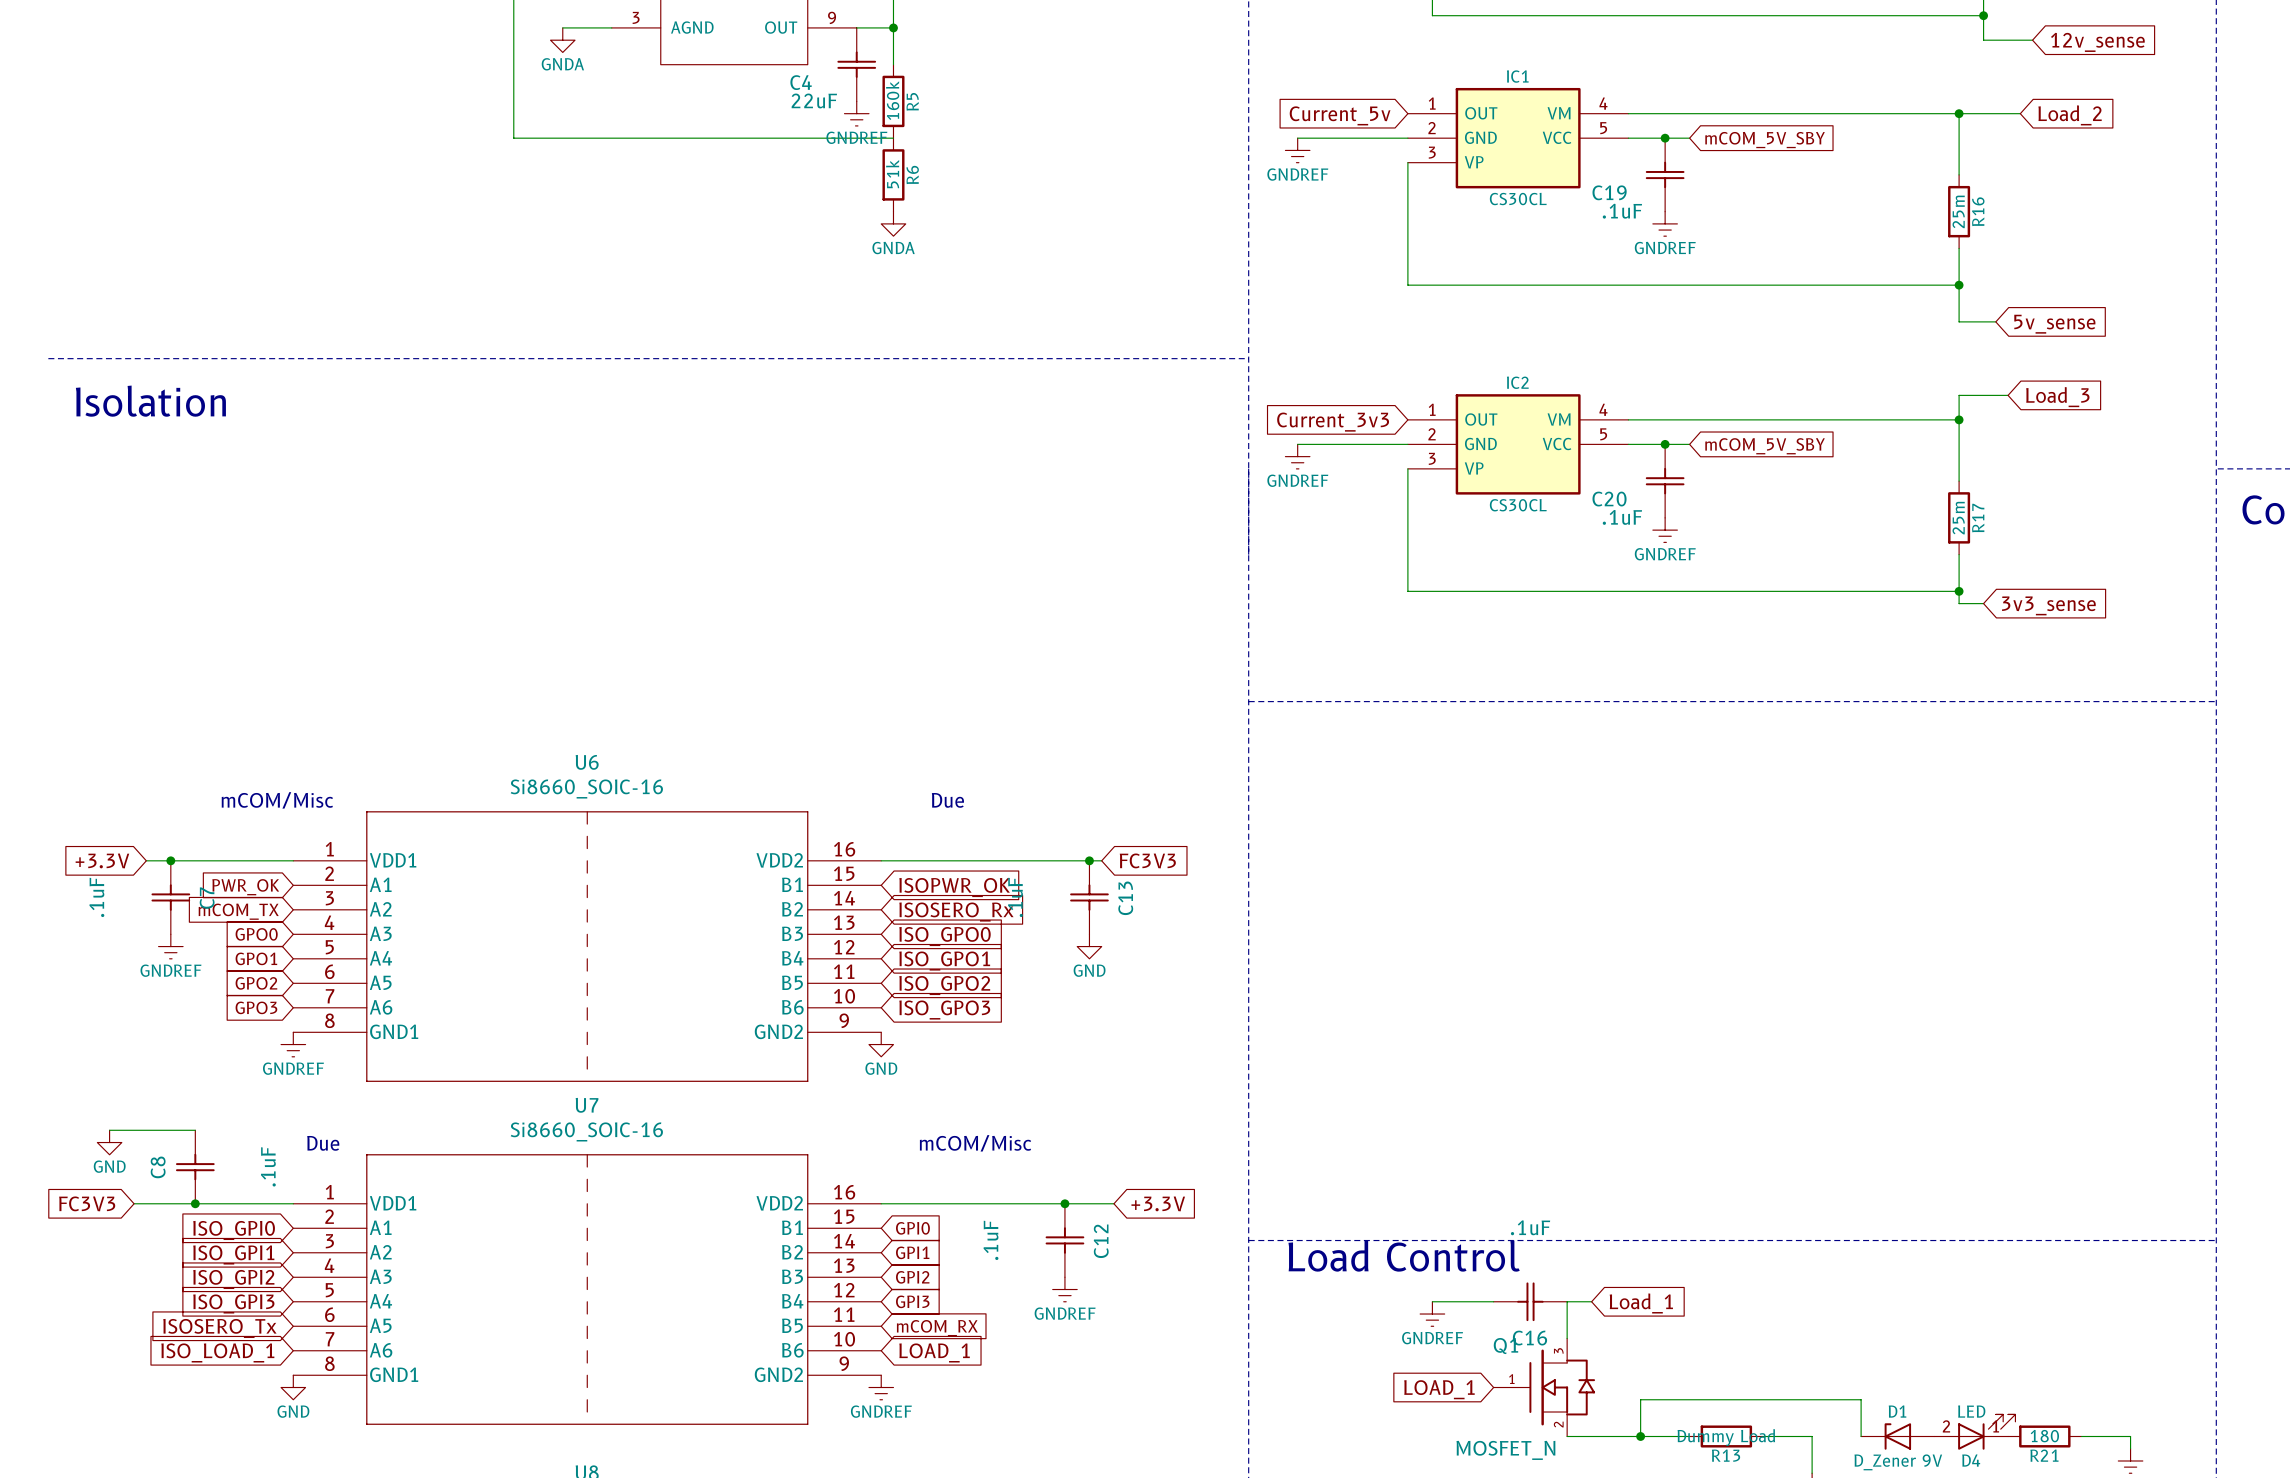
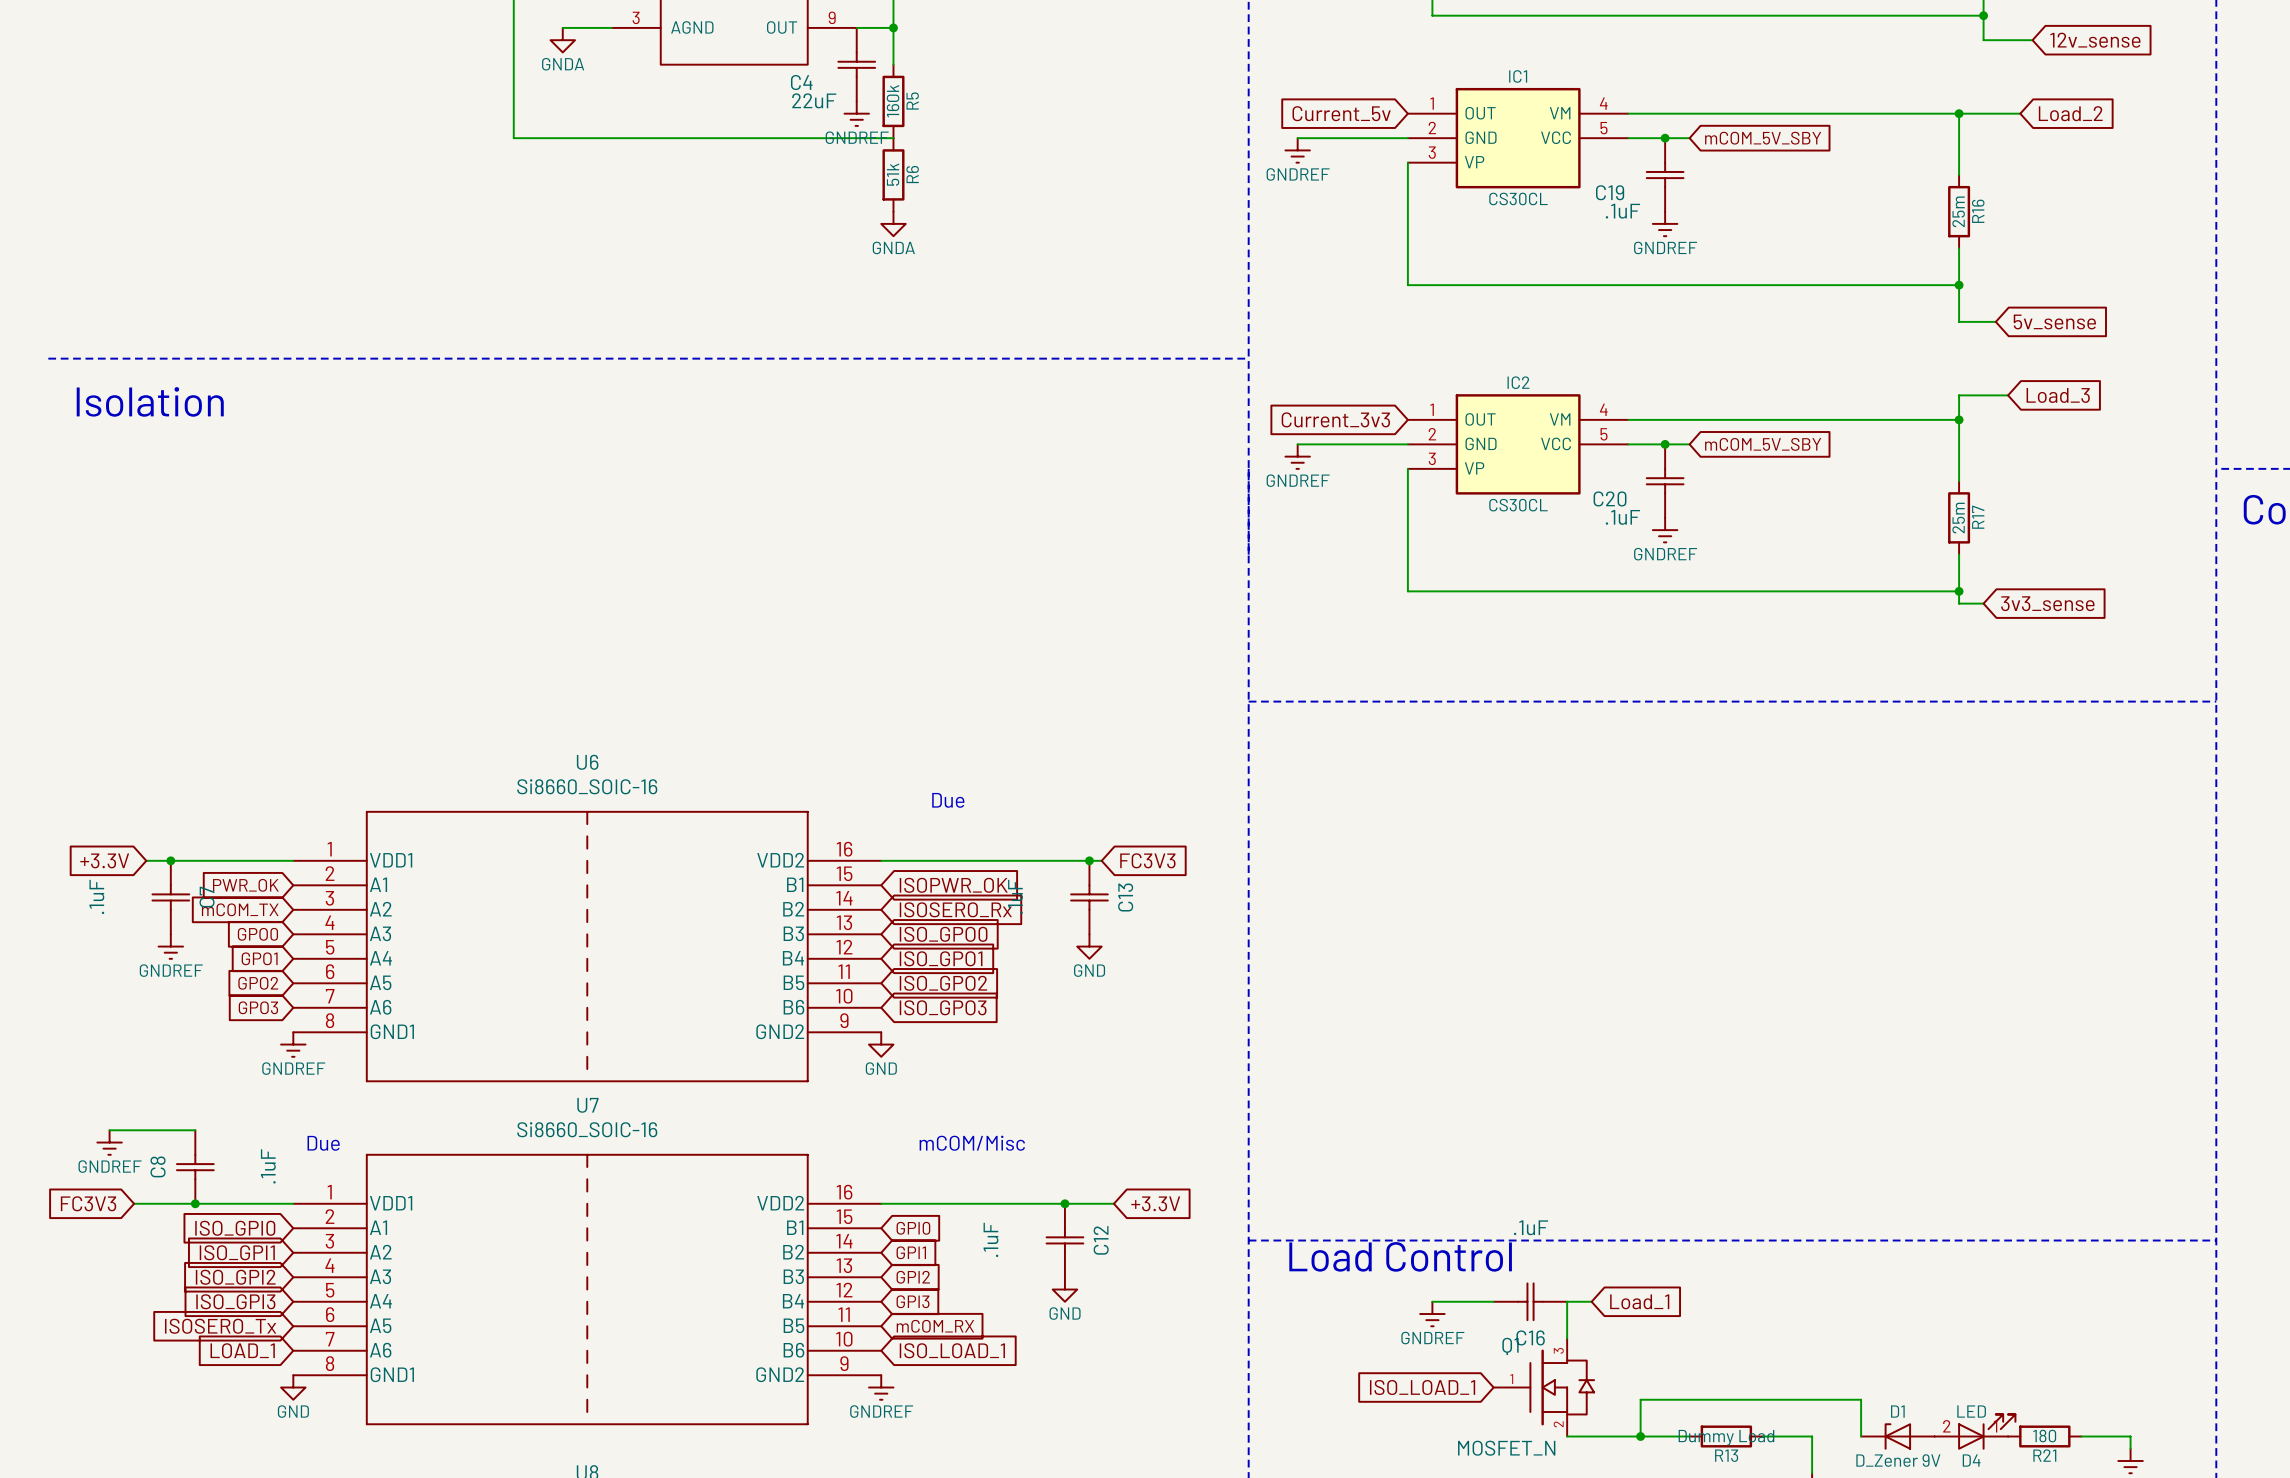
text: mCOM/Misc (277, 800) -> none
power symbol: GND (109, 1142) -> GNDREF (109, 1142)
power symbol: GNDREF (1064, 1289) -> GND (1064, 1289)
global label: ISO_LOAD_1 (217, 1352) -> LOAD_1 (242, 1350)
global label: LOAD_1 (934, 1352) -> ISO_LOAD_1 (952, 1350)
global label: LOAD_1 (1439, 1389) -> ISO_LOAD_1 (1422, 1387)

